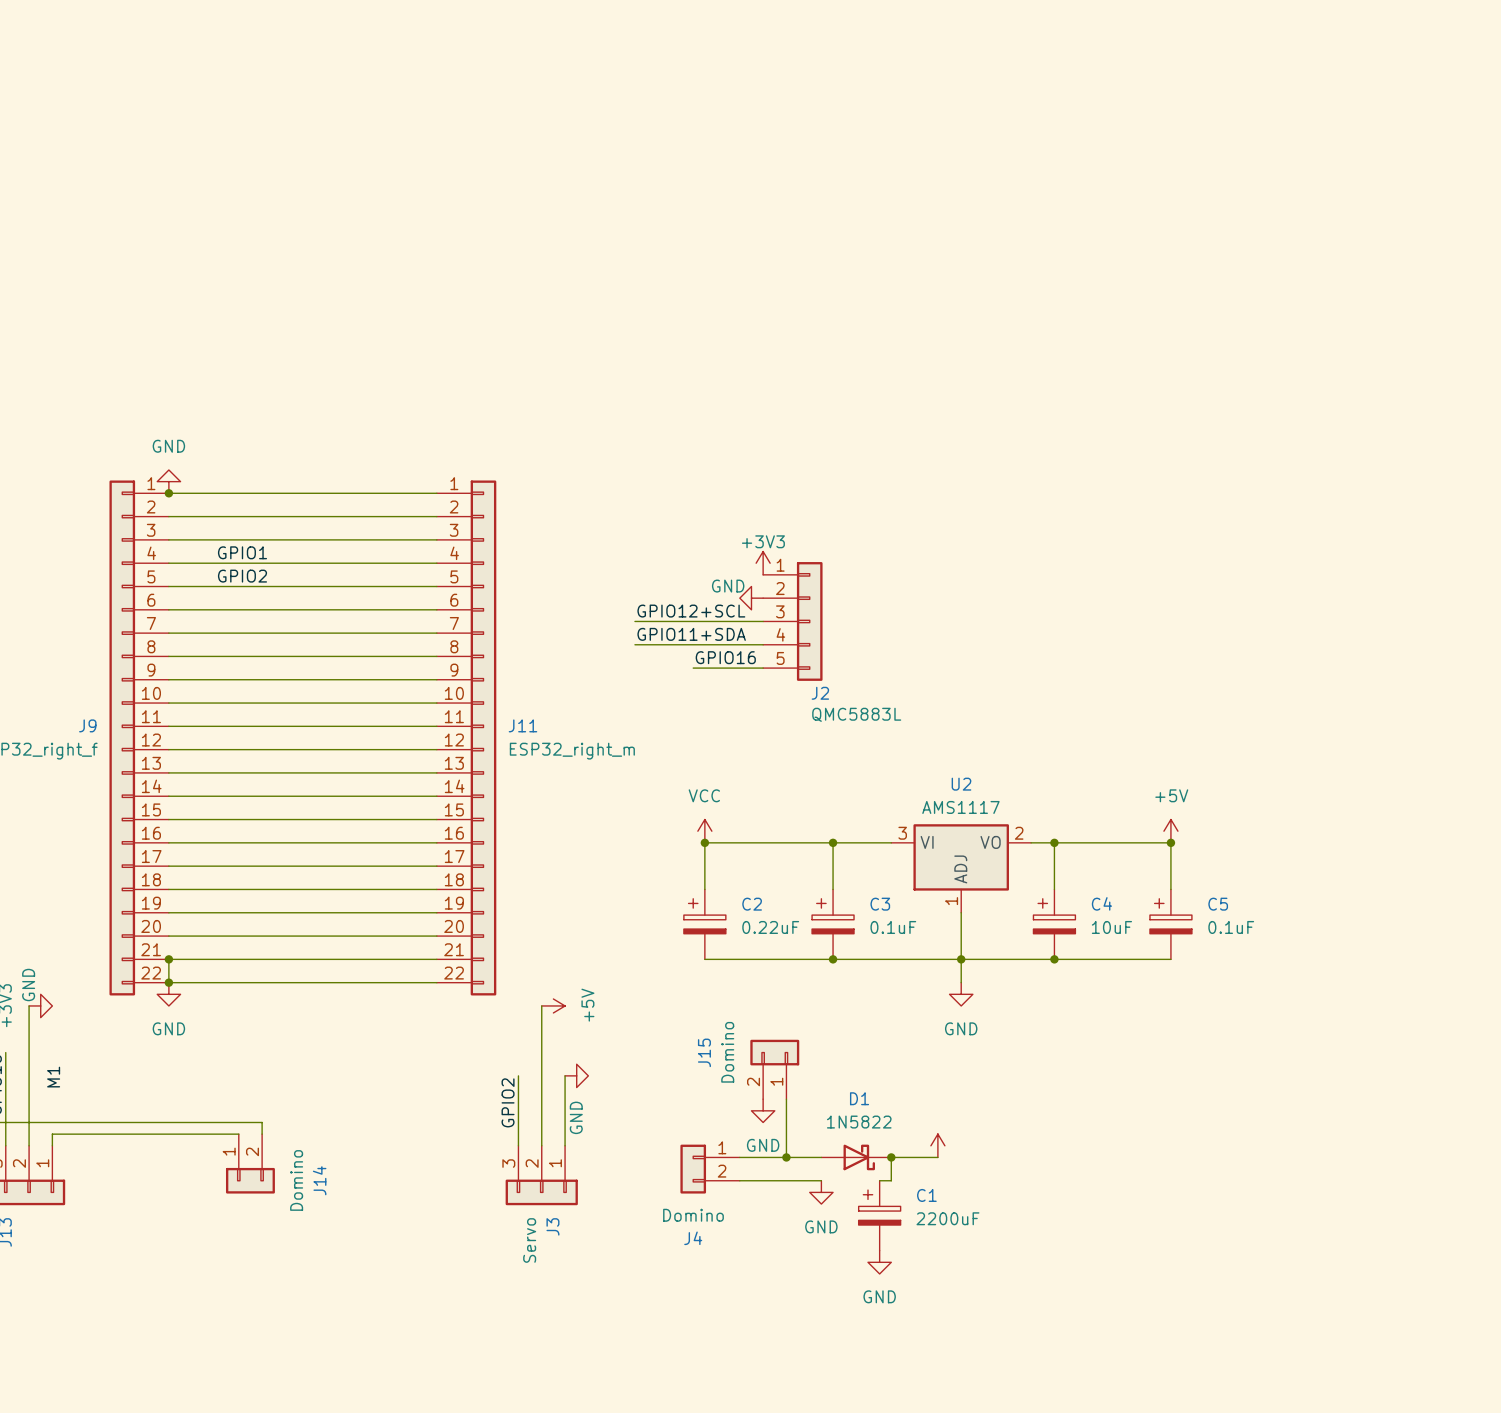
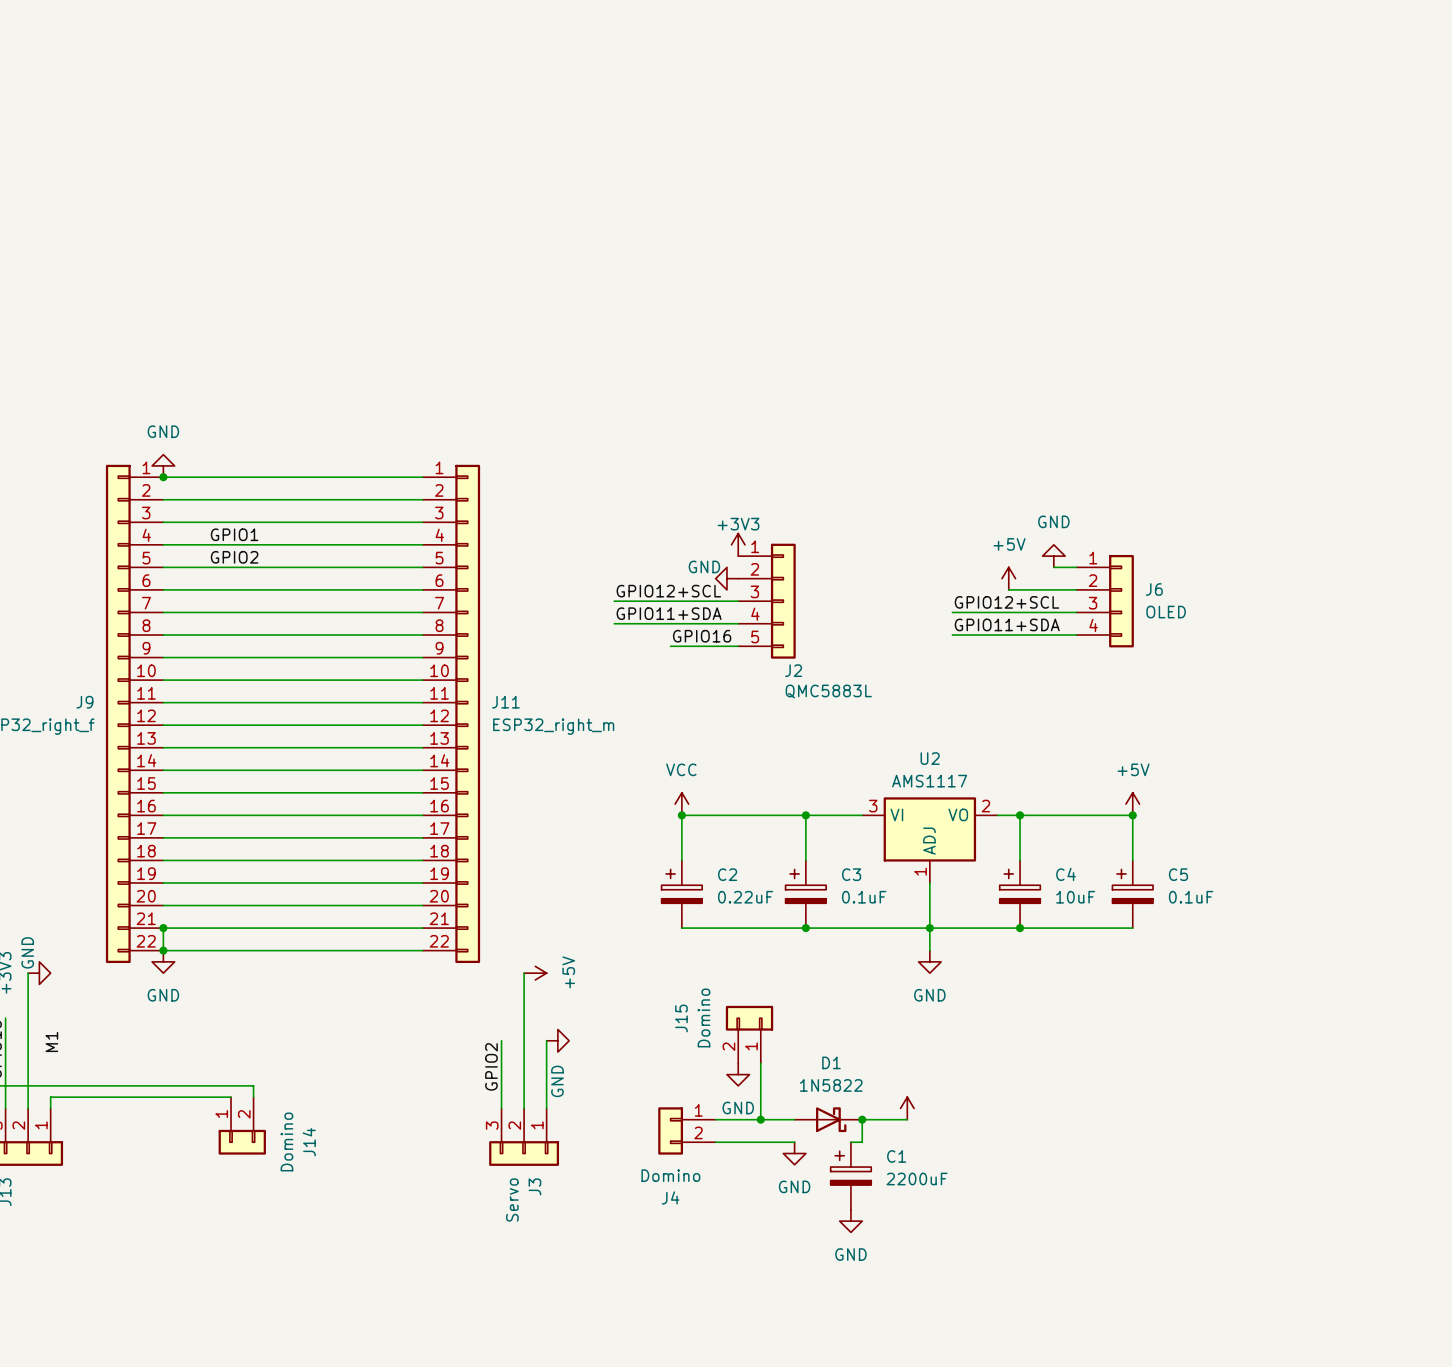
power symbol: none -> GND (1053, 556)
wire: none -> (1053, 567) (1076, 567)
power symbol: none -> +5V (1008, 578)
wire: none -> (1008, 589) (1076, 589)
J6: none -> OLED (1105, 601)
label: none -> GPIO12+SCL (1006, 602)
wire: none -> (952, 612) (1076, 612)
label: none -> GPIO11+SDA (1007, 624)
wire: none -> (952, 635) (1076, 635)

